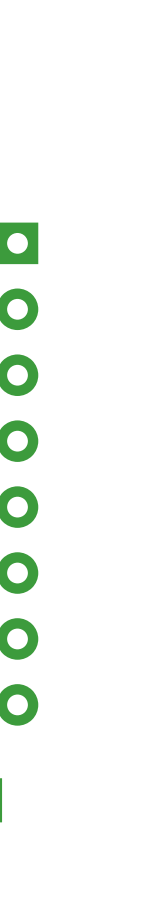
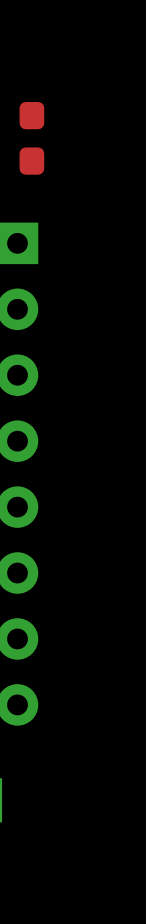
part: none -> (31, 138)

